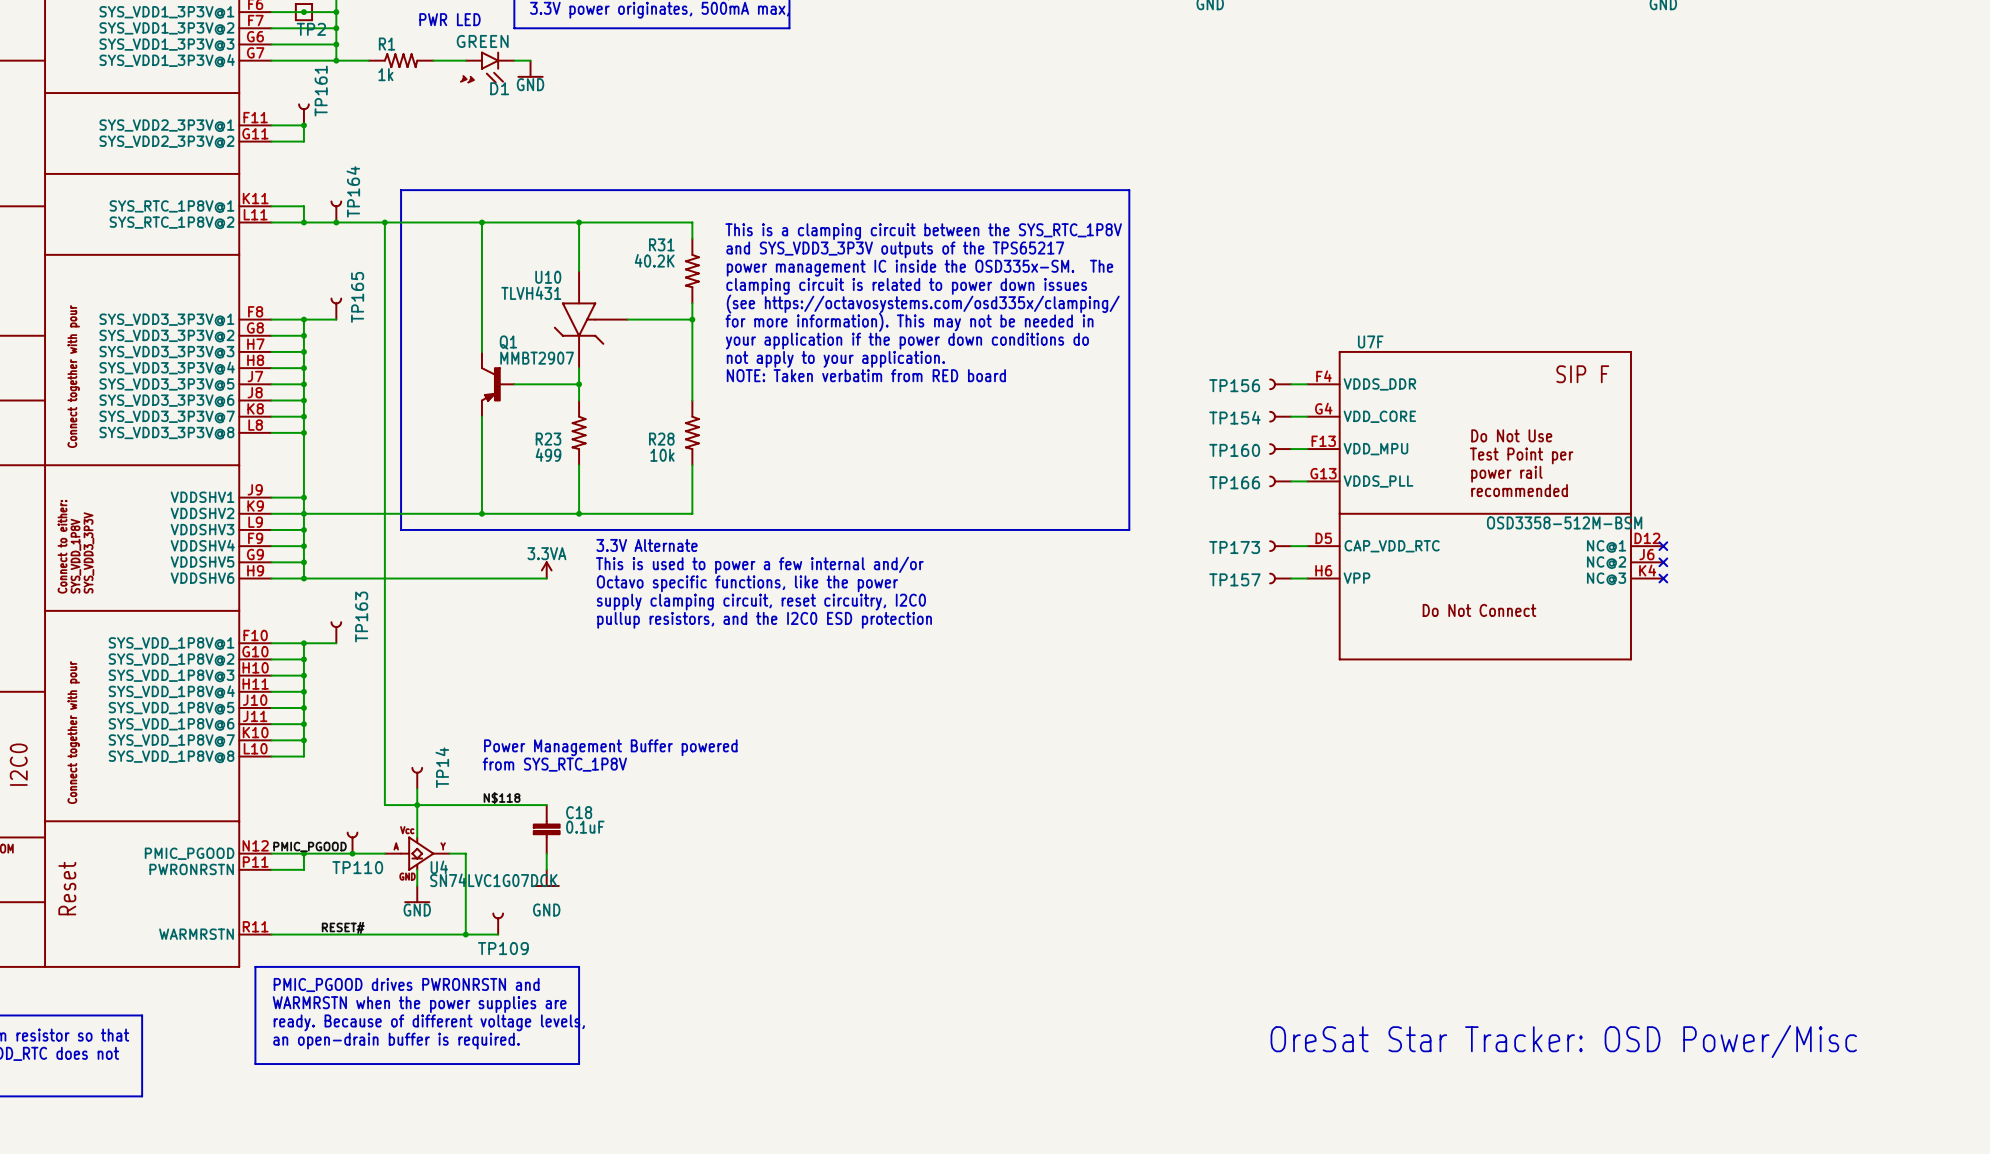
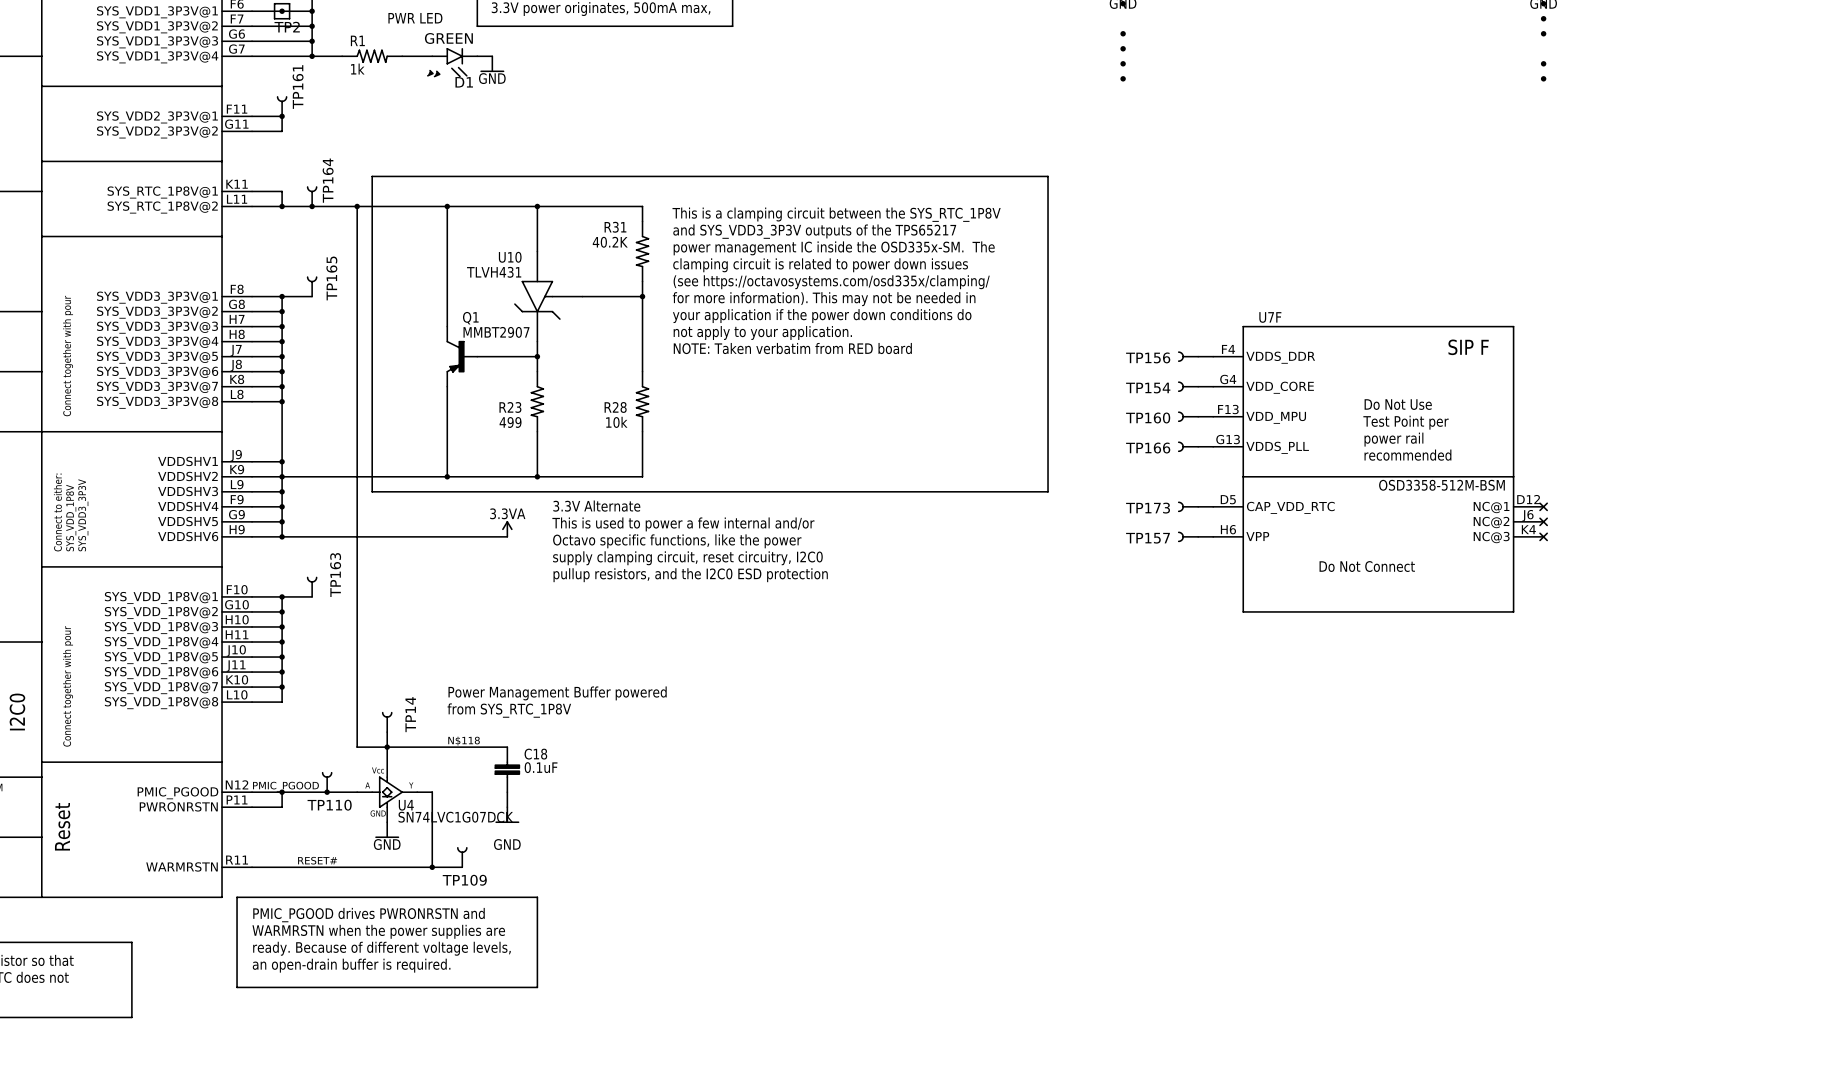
junction: none -> (1123, 3)
junction: none -> (1543, 3)
junction: none -> (1543, 18)
junction: none -> (1123, 33)
junction: none -> (1543, 33)
junction: none -> (1123, 48)
junction: none -> (1123, 63)
junction: none -> (1543, 63)
junction: none -> (1123, 78)
junction: none -> (1543, 78)
text: OreSat Star Tracker: OSD Power/Misc (1563, 1041) -> none

